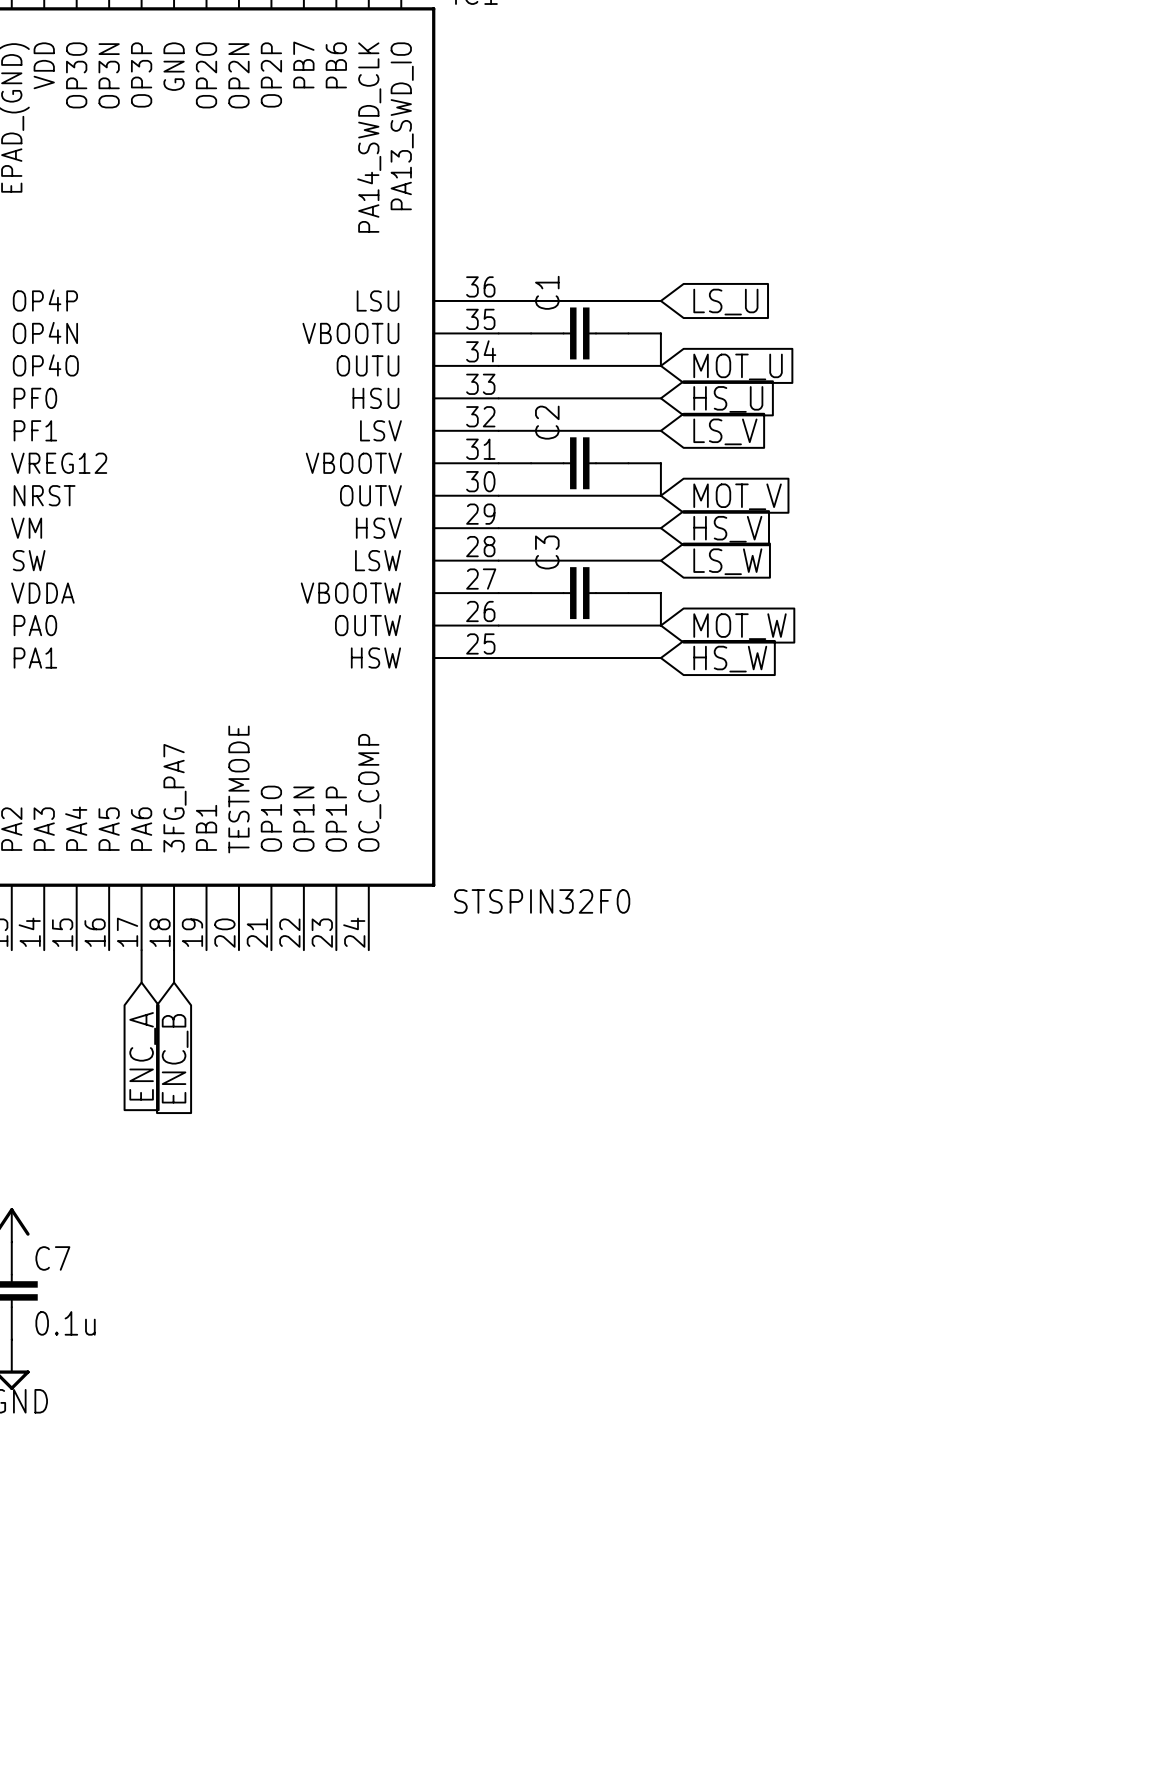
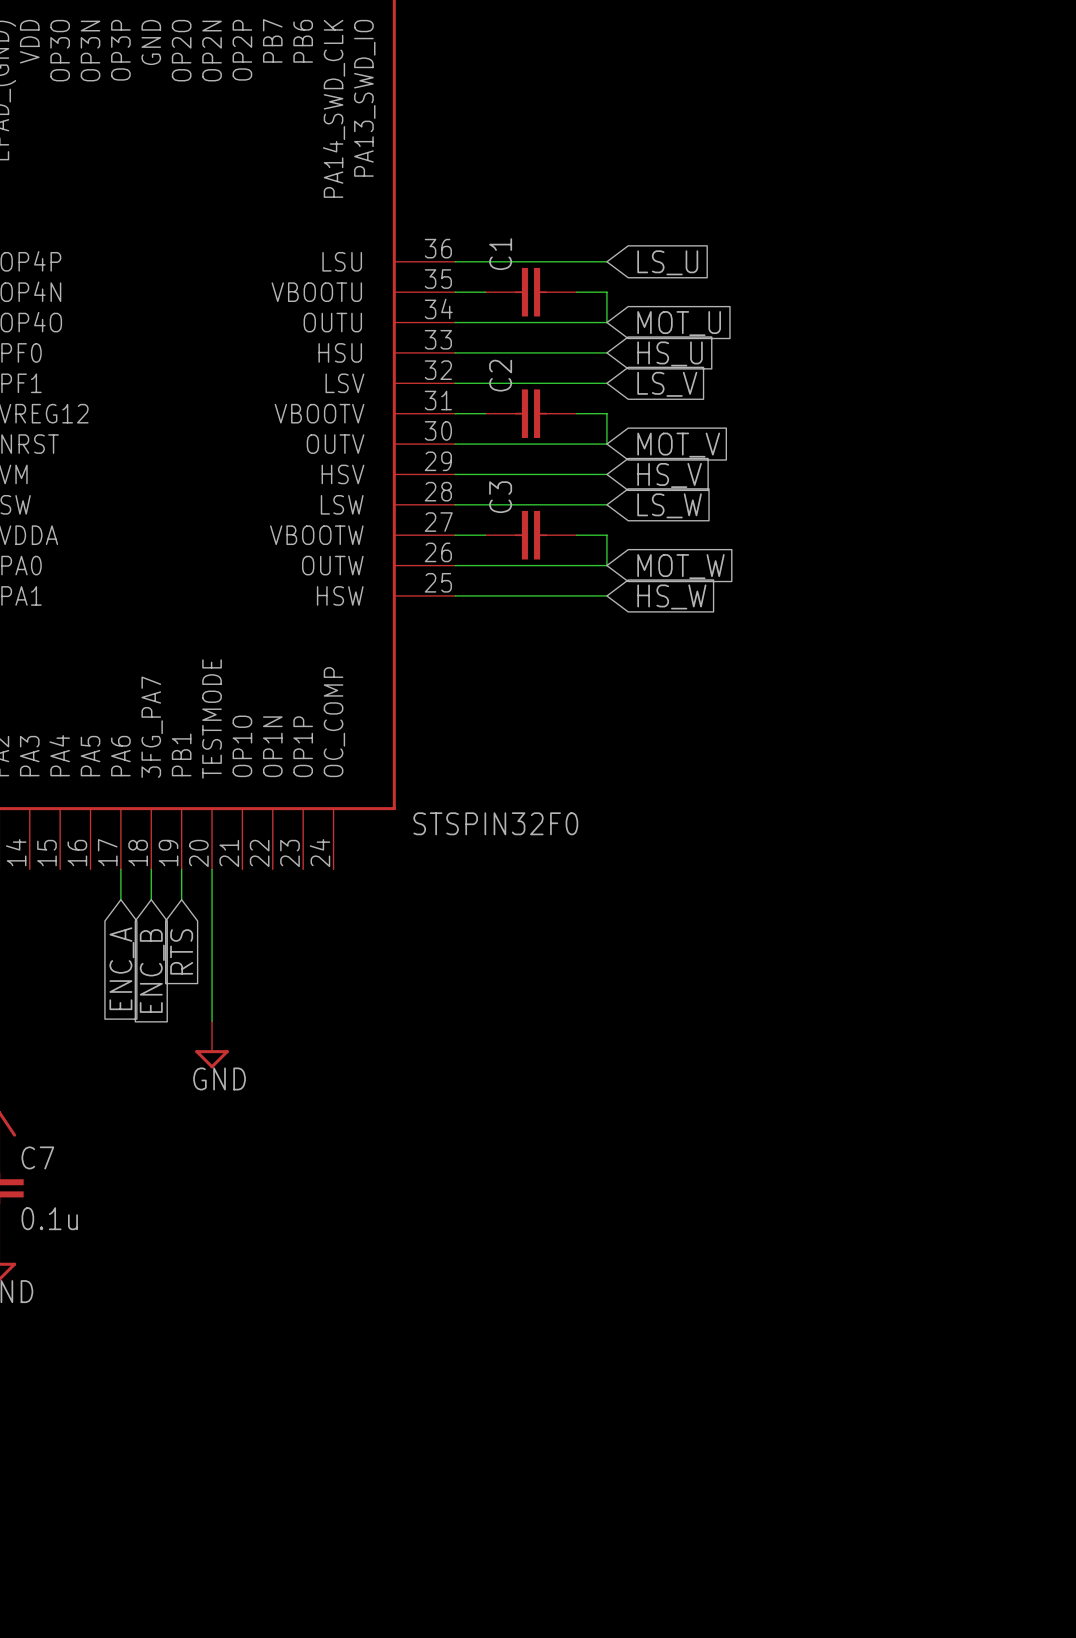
wire: none -> (181, 869) (181, 899)
wire: none -> (212, 869) (212, 1021)
global label: none -> RTS (181, 951)
power symbol: none -> GND (212, 1044)

